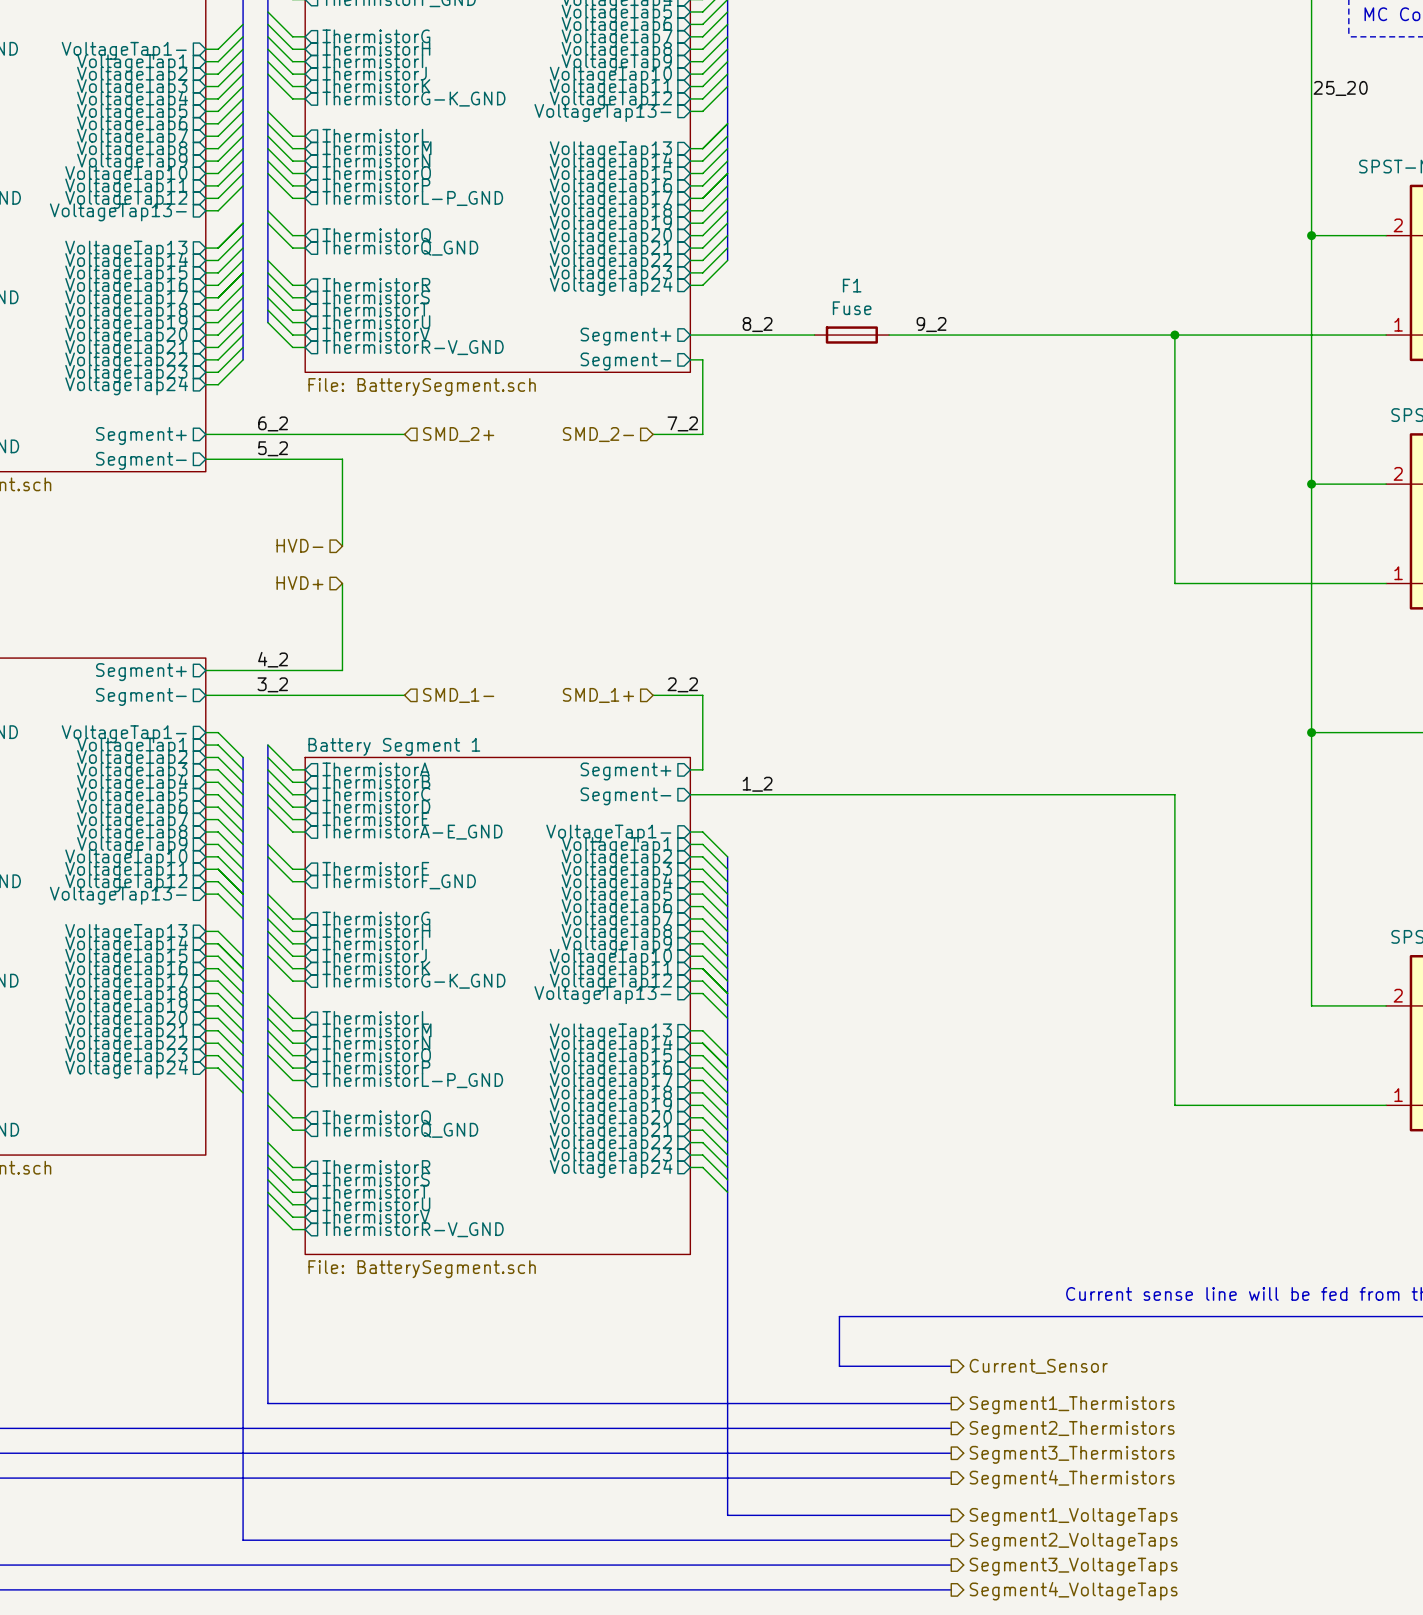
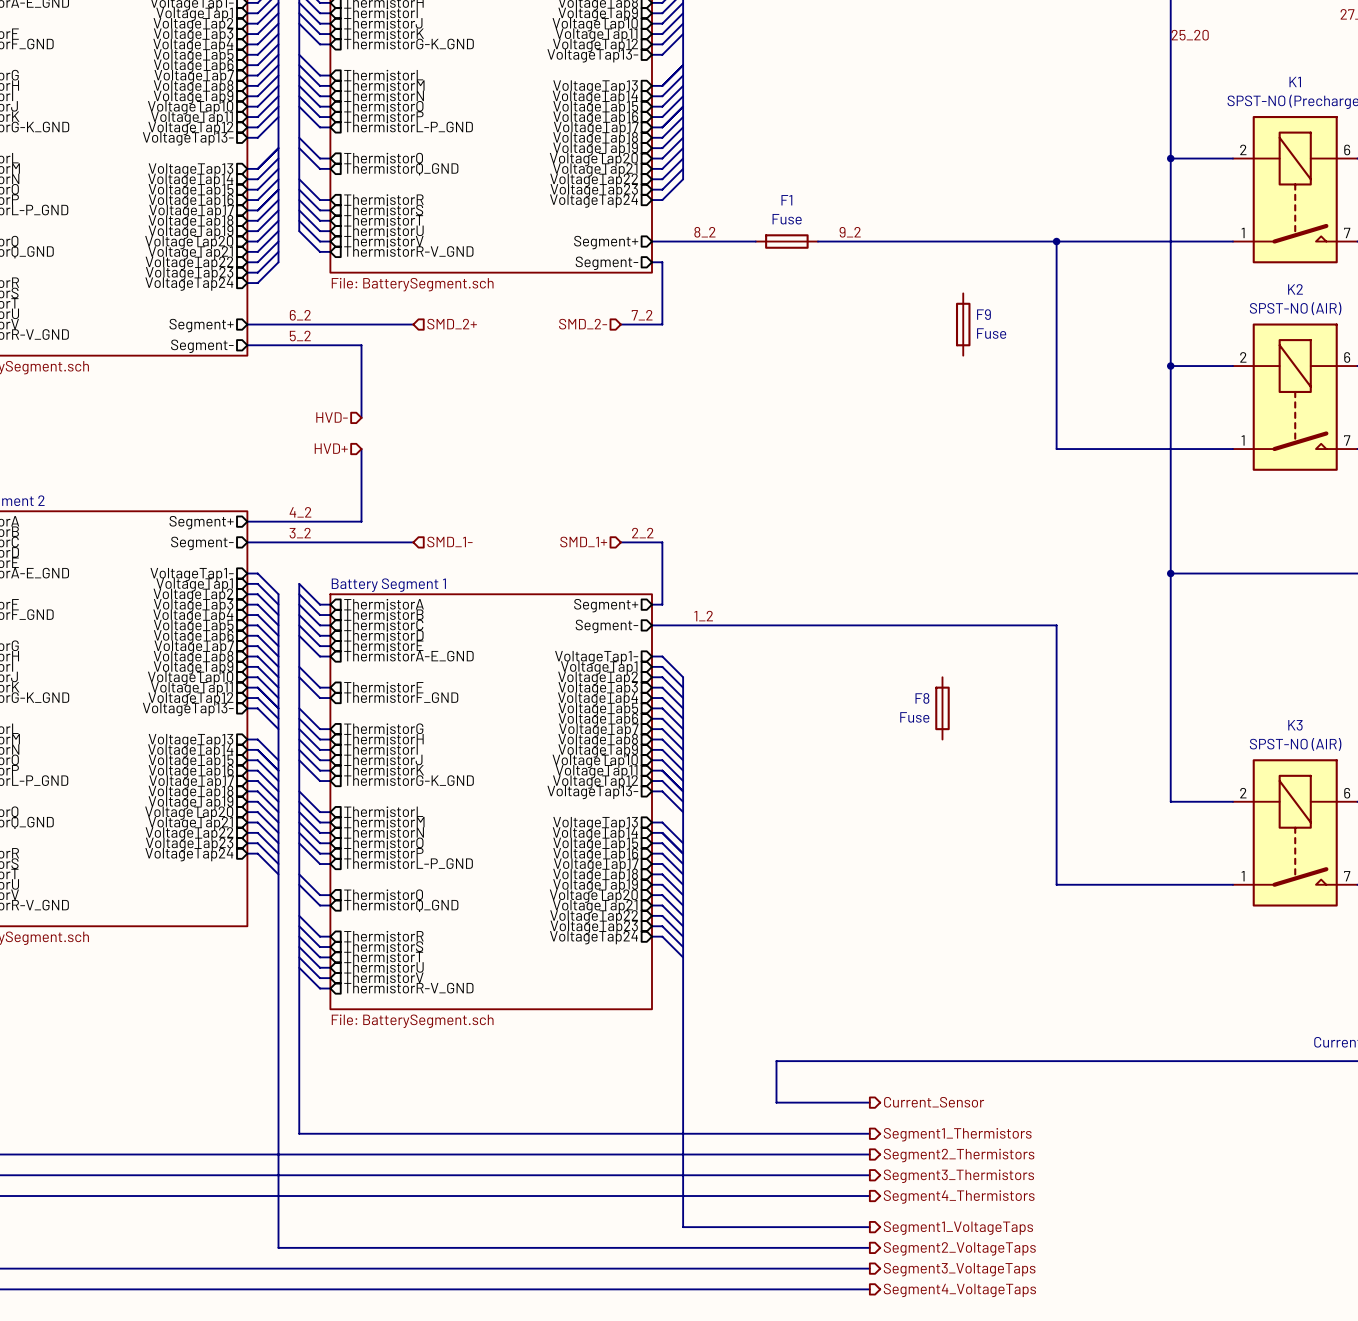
F9: none -> Fuse (963, 324)
F8: none -> Fuse (942, 708)

